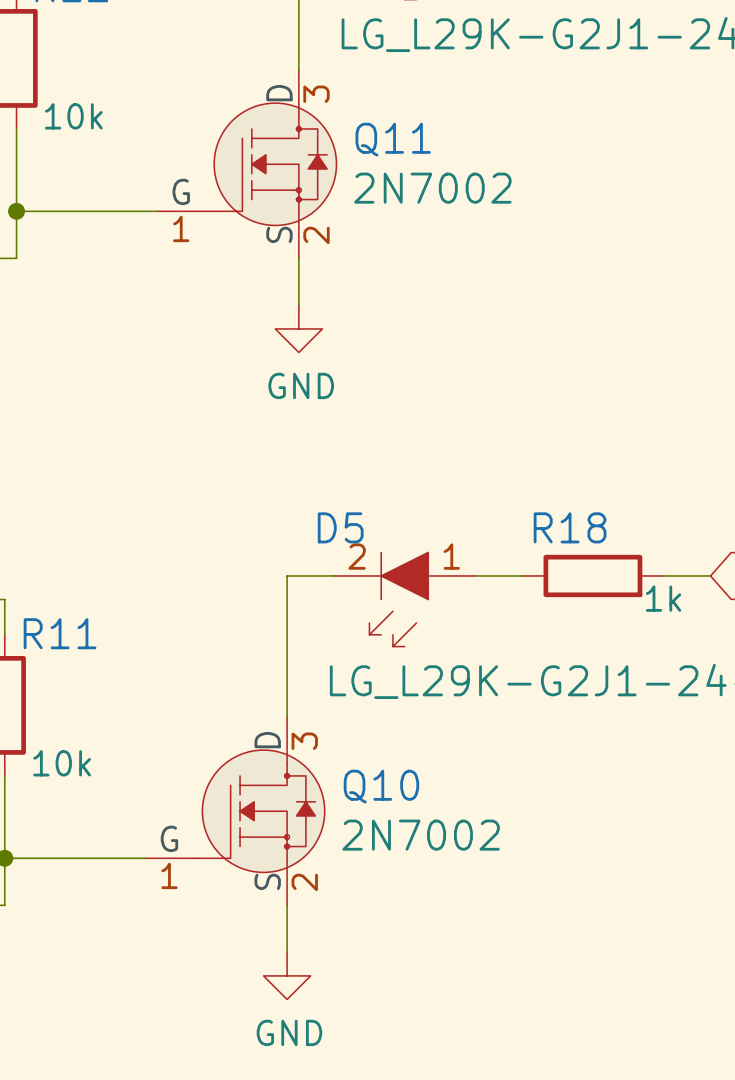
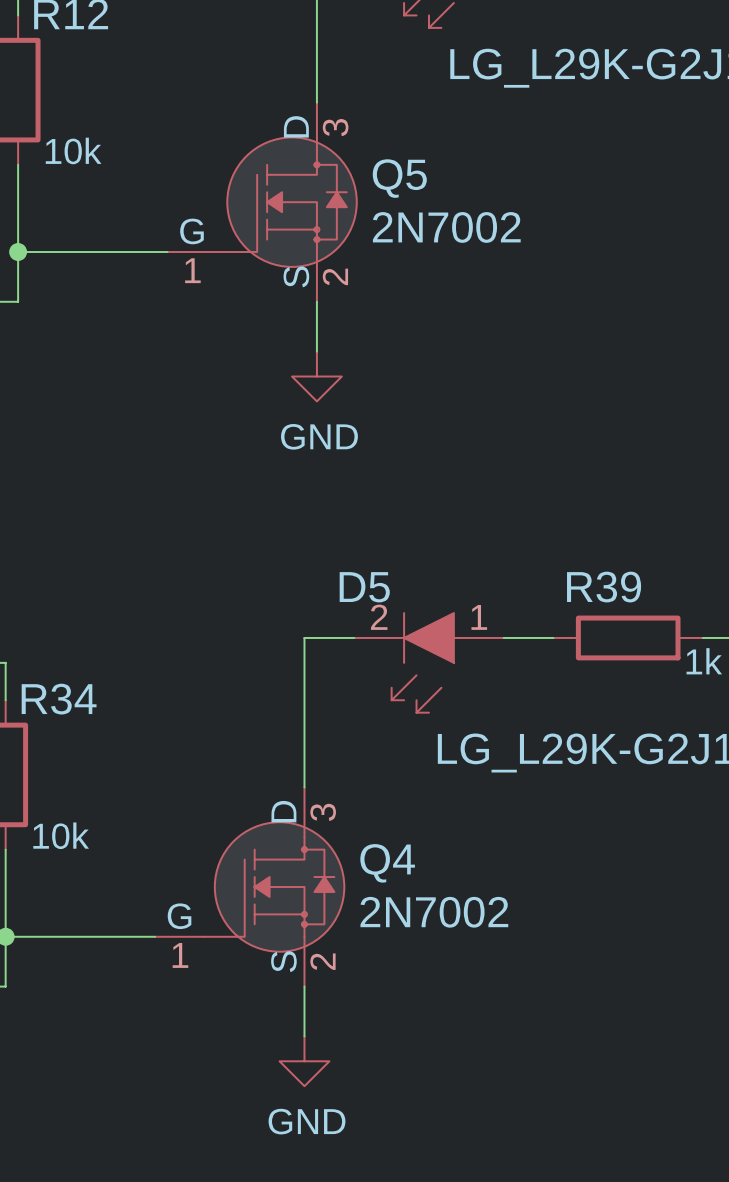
Q11 name: Q11 (393, 139) -> Q5 (399, 178)
R18 name: R18 (570, 527) -> R39 (604, 587)
R11 name: R11 (60, 633) -> R34 (59, 699)
Q10 name: Q10 (381, 786) -> Q4 (387, 863)

